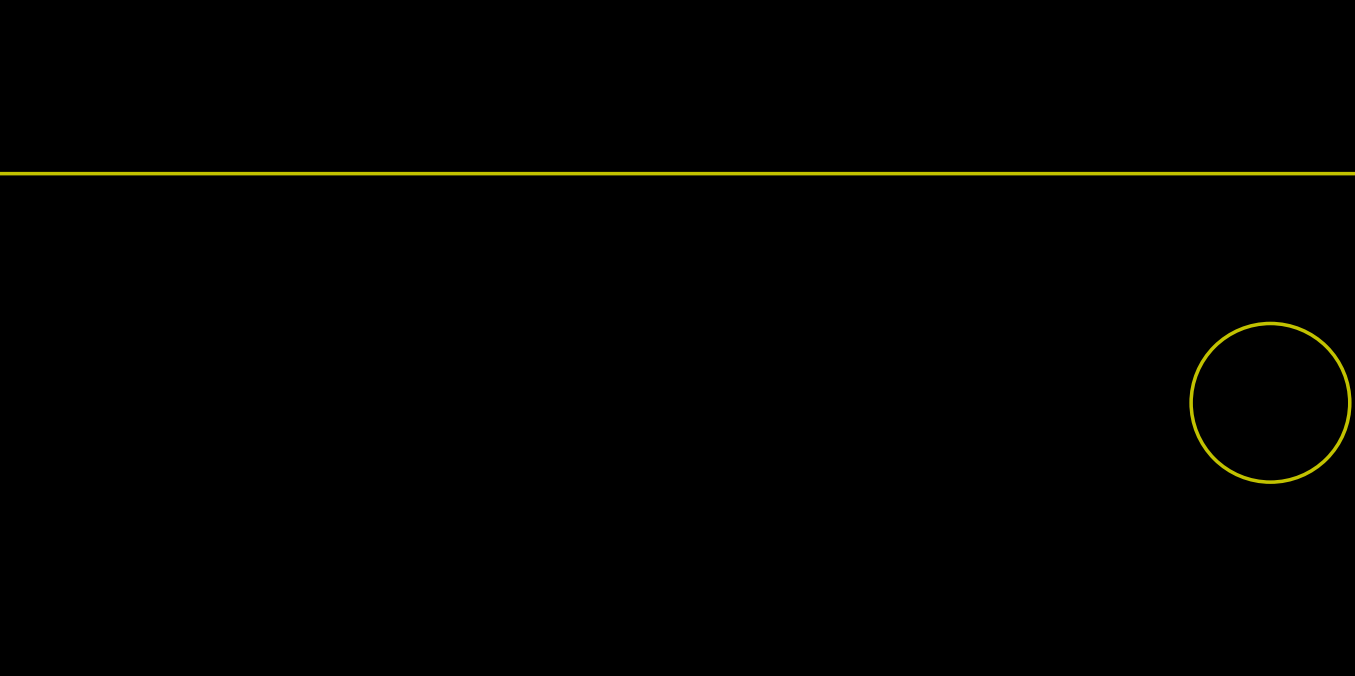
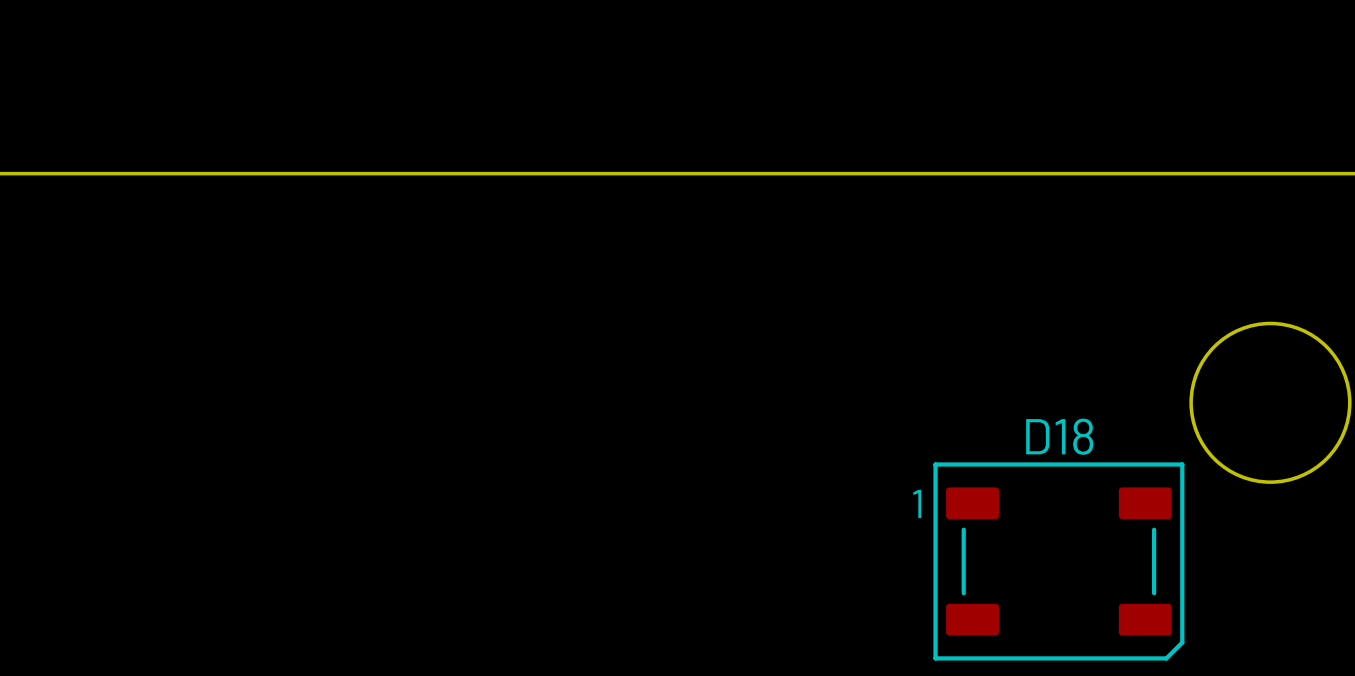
D18: none -> (1058, 561)

